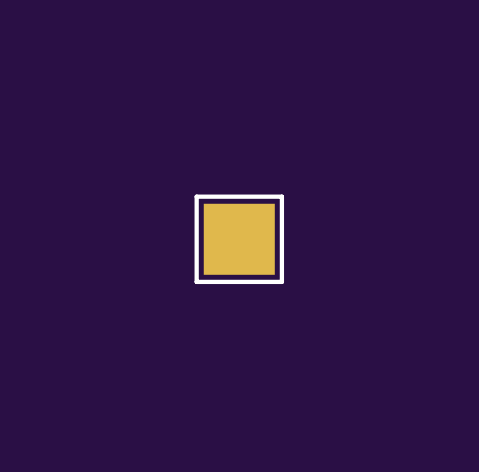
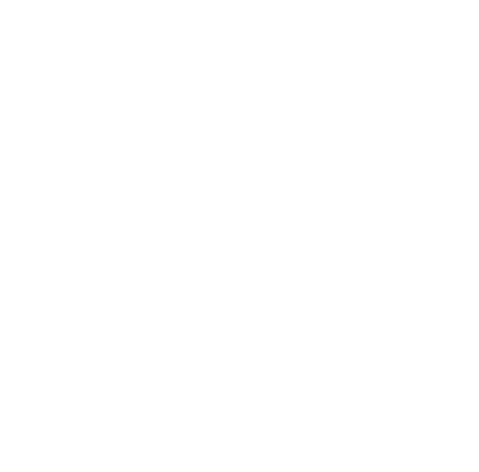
part: (239, 239) -> none

